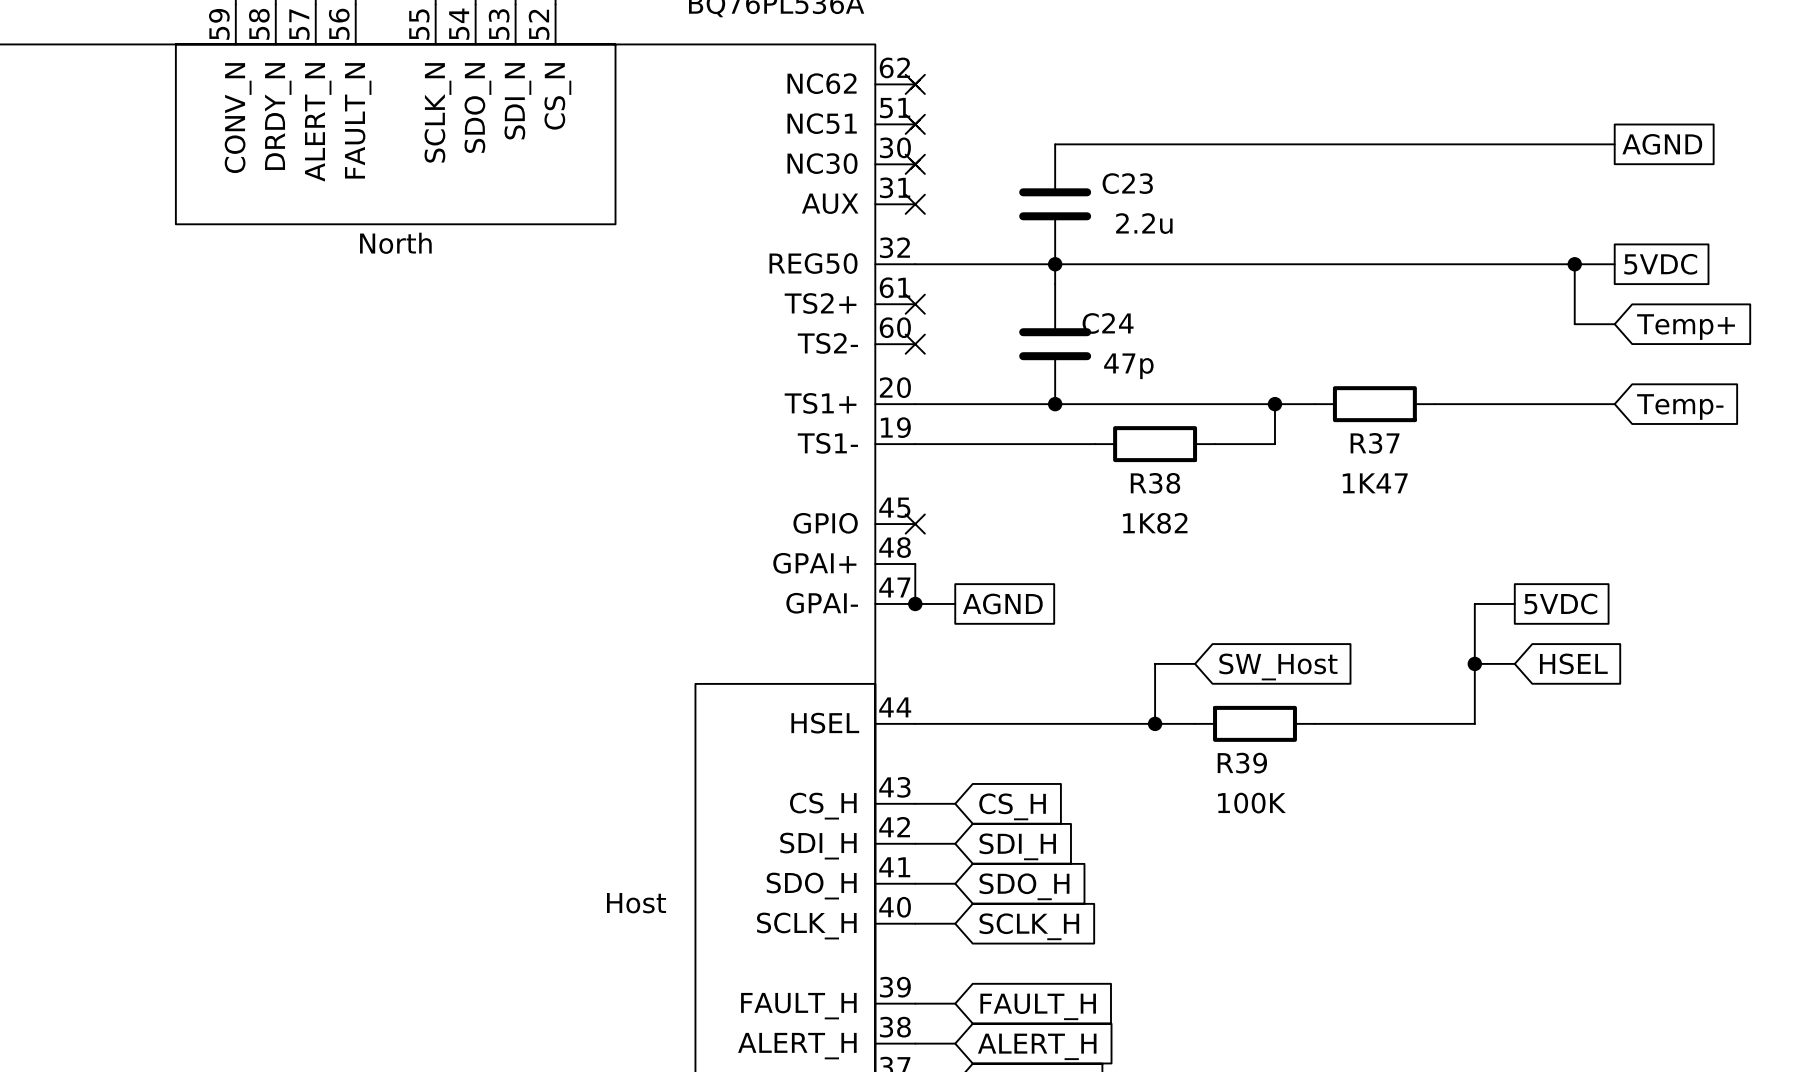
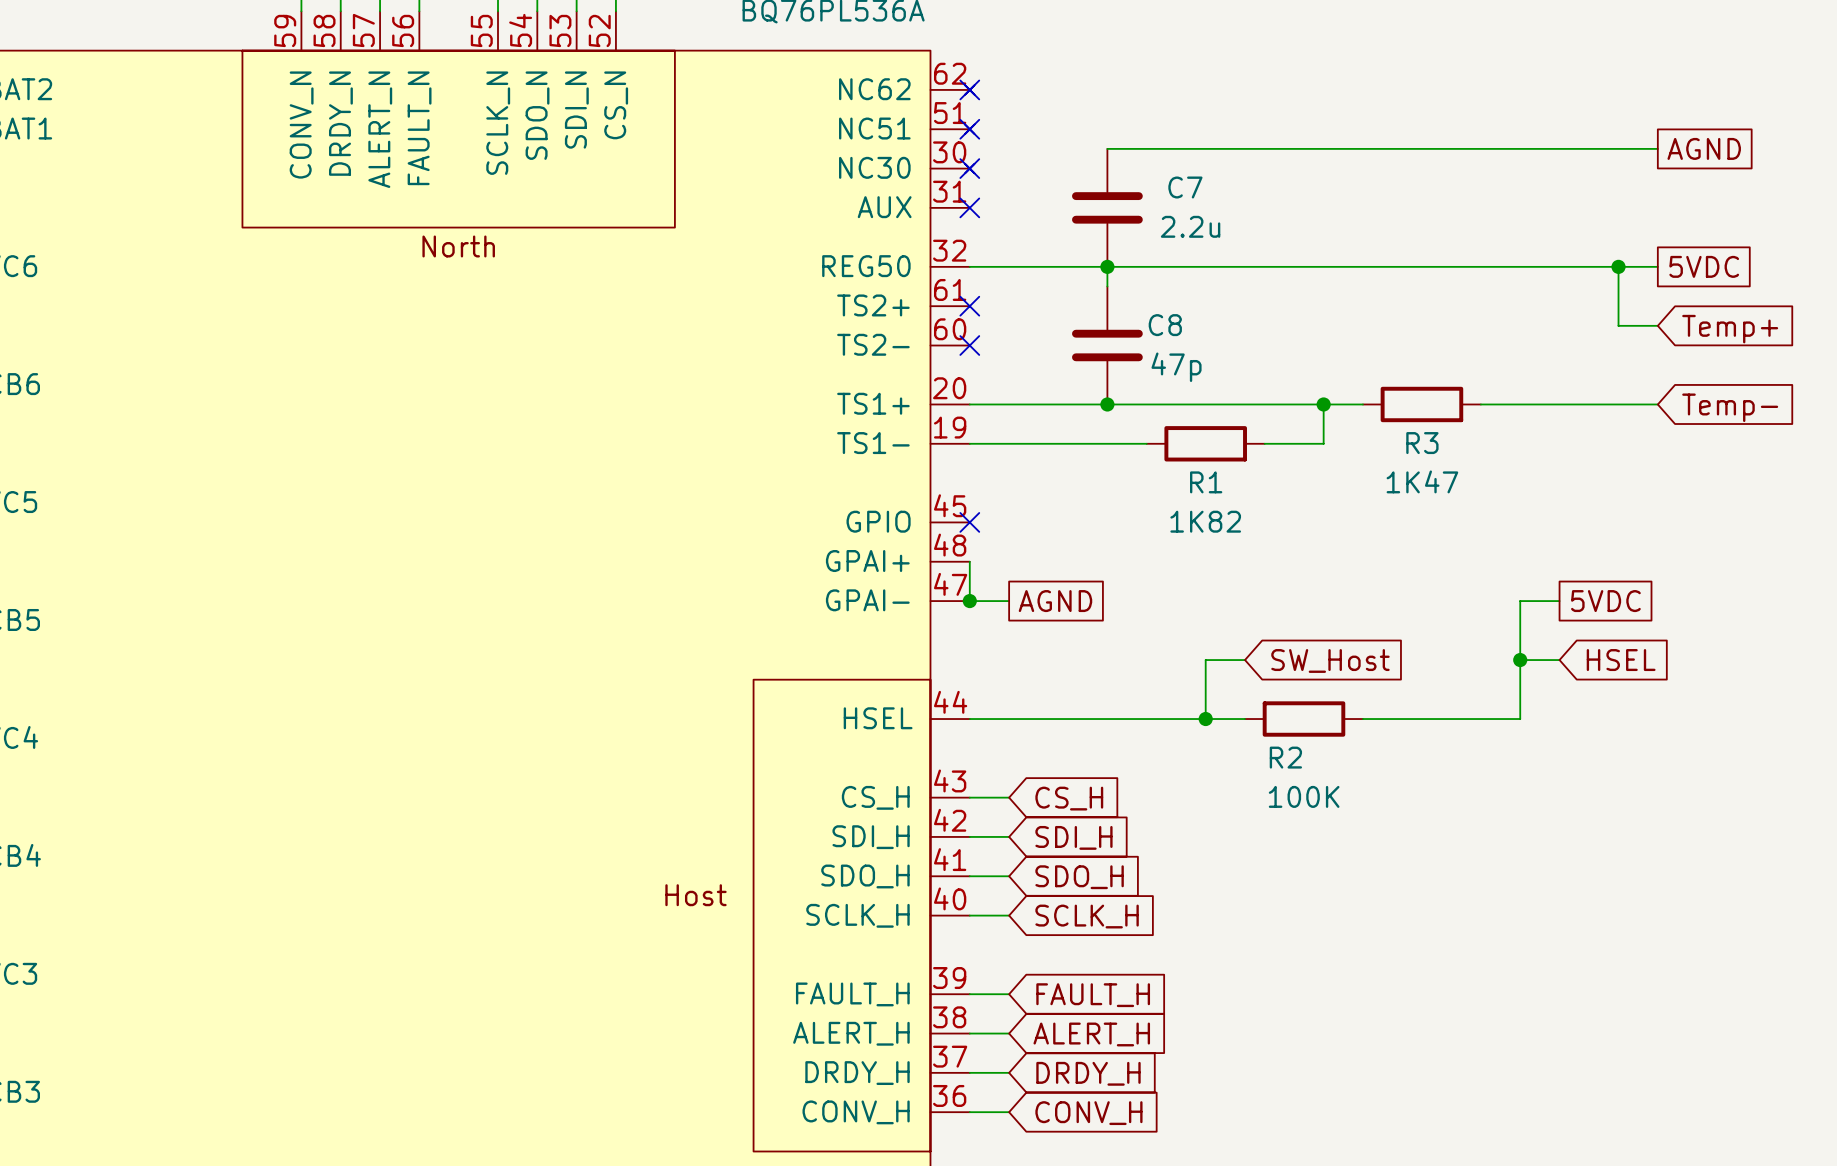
C23 name: C23 (1127, 183) -> C7 (1185, 187)
C24 name: C24 (1108, 323) -> C8 (1165, 325)
R37 name: R37 (1375, 443) -> R3 (1422, 443)
R38 name: R38 (1155, 483) -> R1 (1206, 482)
R39 name: R39 (1242, 763) -> R2 (1285, 757)

